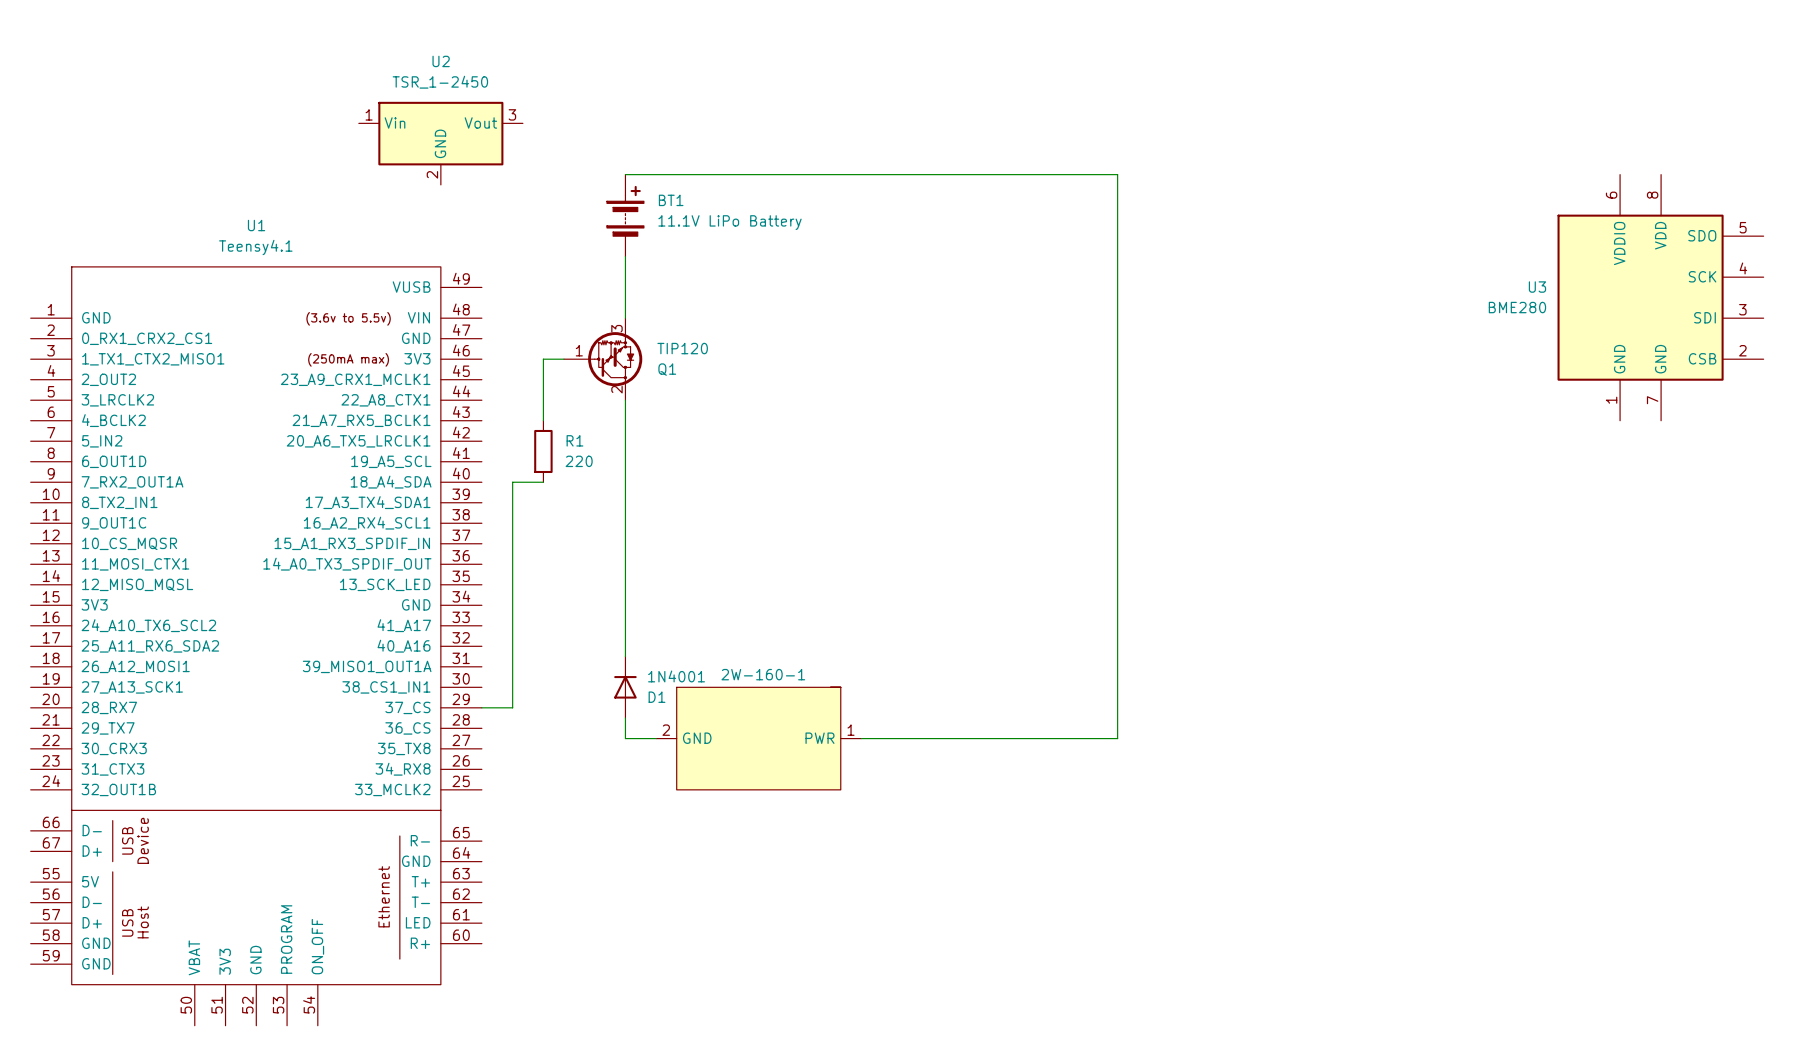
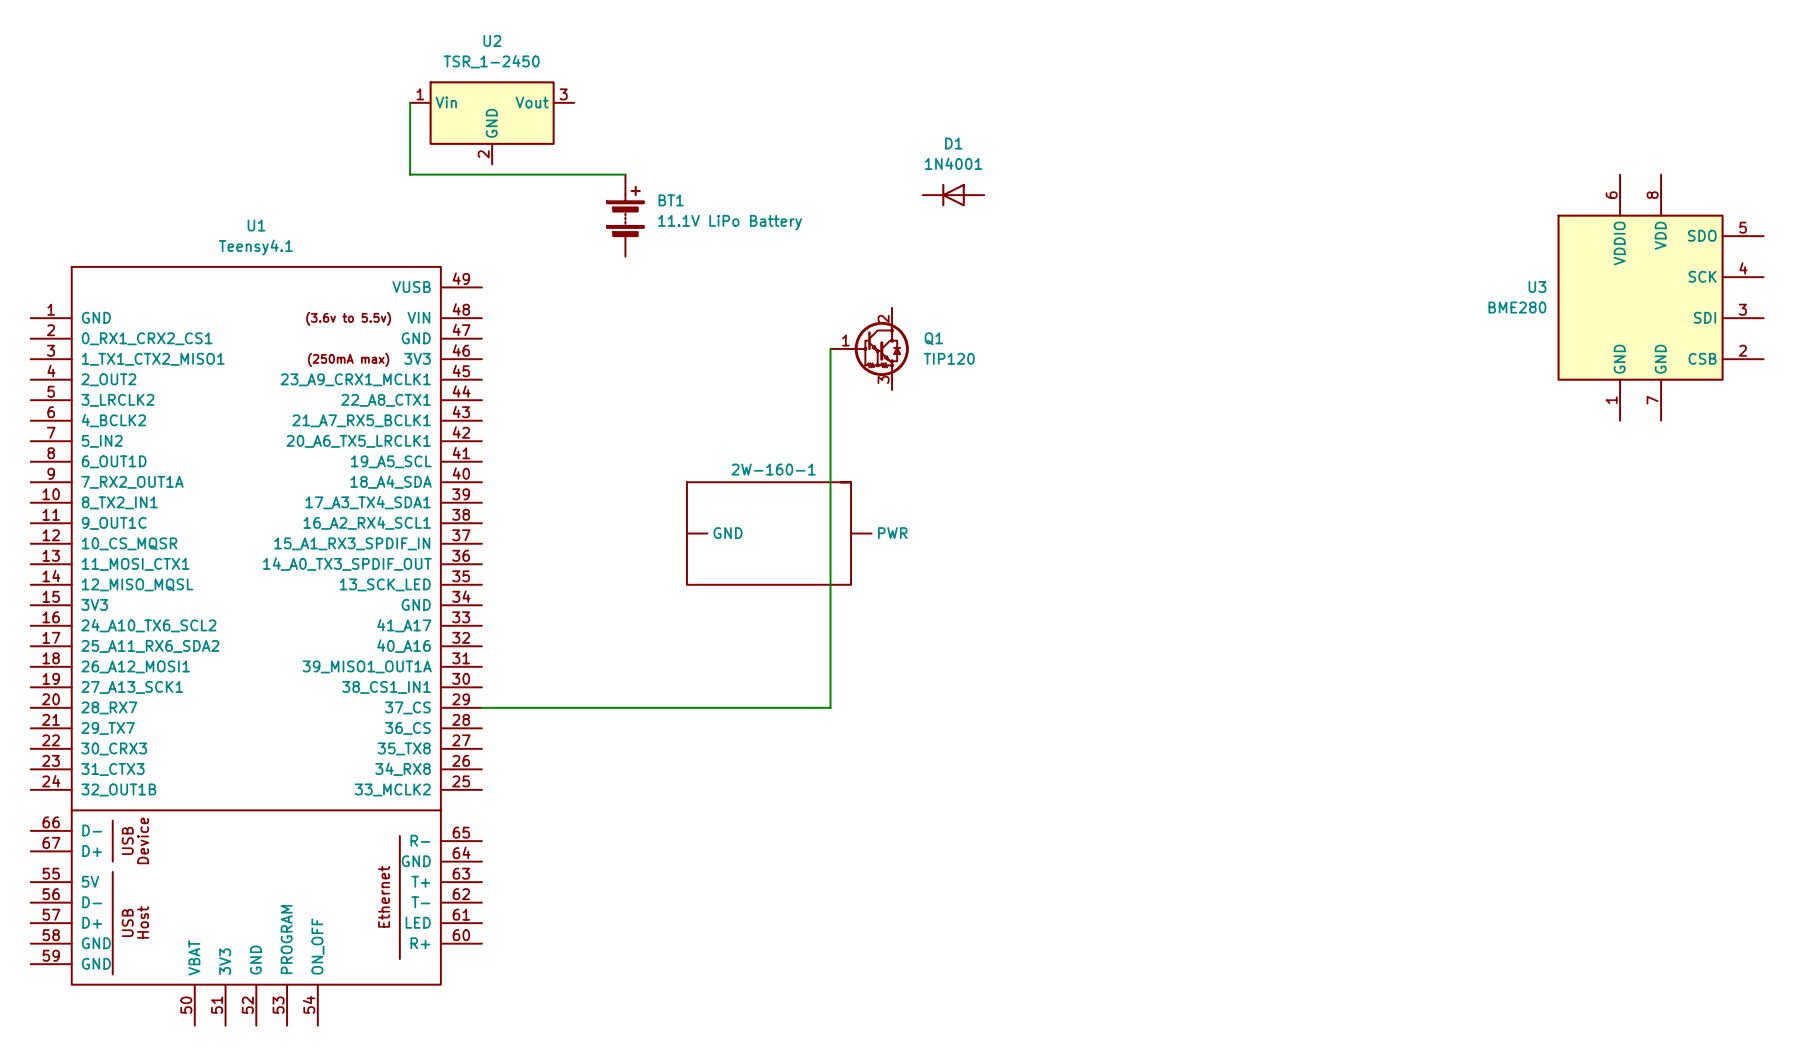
U2 position: (440, 143) -> (492, 122)
wire: (625, 174) (1117, 174) (1117, 738) (861, 738) -> (625, 174) (410, 174) (410, 102)
wire: (625, 256) (625, 318) -> none
wire: (563, 359) (543, 359) (543, 420) -> none
Q1 position: (603, 359) -> (869, 348)
Q1 flip: as is (615, 359) -> up-down (881, 348)
wire: (625, 400) (625, 656) -> none
R1: 220 (543, 451) -> none
wire: (543, 482) (512, 482) (512, 707) -> (830, 348) (830, 707) (512, 707)
D1 value position: 1N4001 (676, 676) -> 1N4001 (953, 163)
D1 rotation: 0° (625, 687) -> 90° counterclockwise (953, 195)
D1 position: (625, 687) -> (953, 195)
2W-160-1 symbol: [656, 687, 862, 790] -> [686, 482, 872, 585]
D1 name position: D1 (657, 697) -> D1 (953, 143)
wire: (625, 718) (625, 738) (656, 738) -> none

